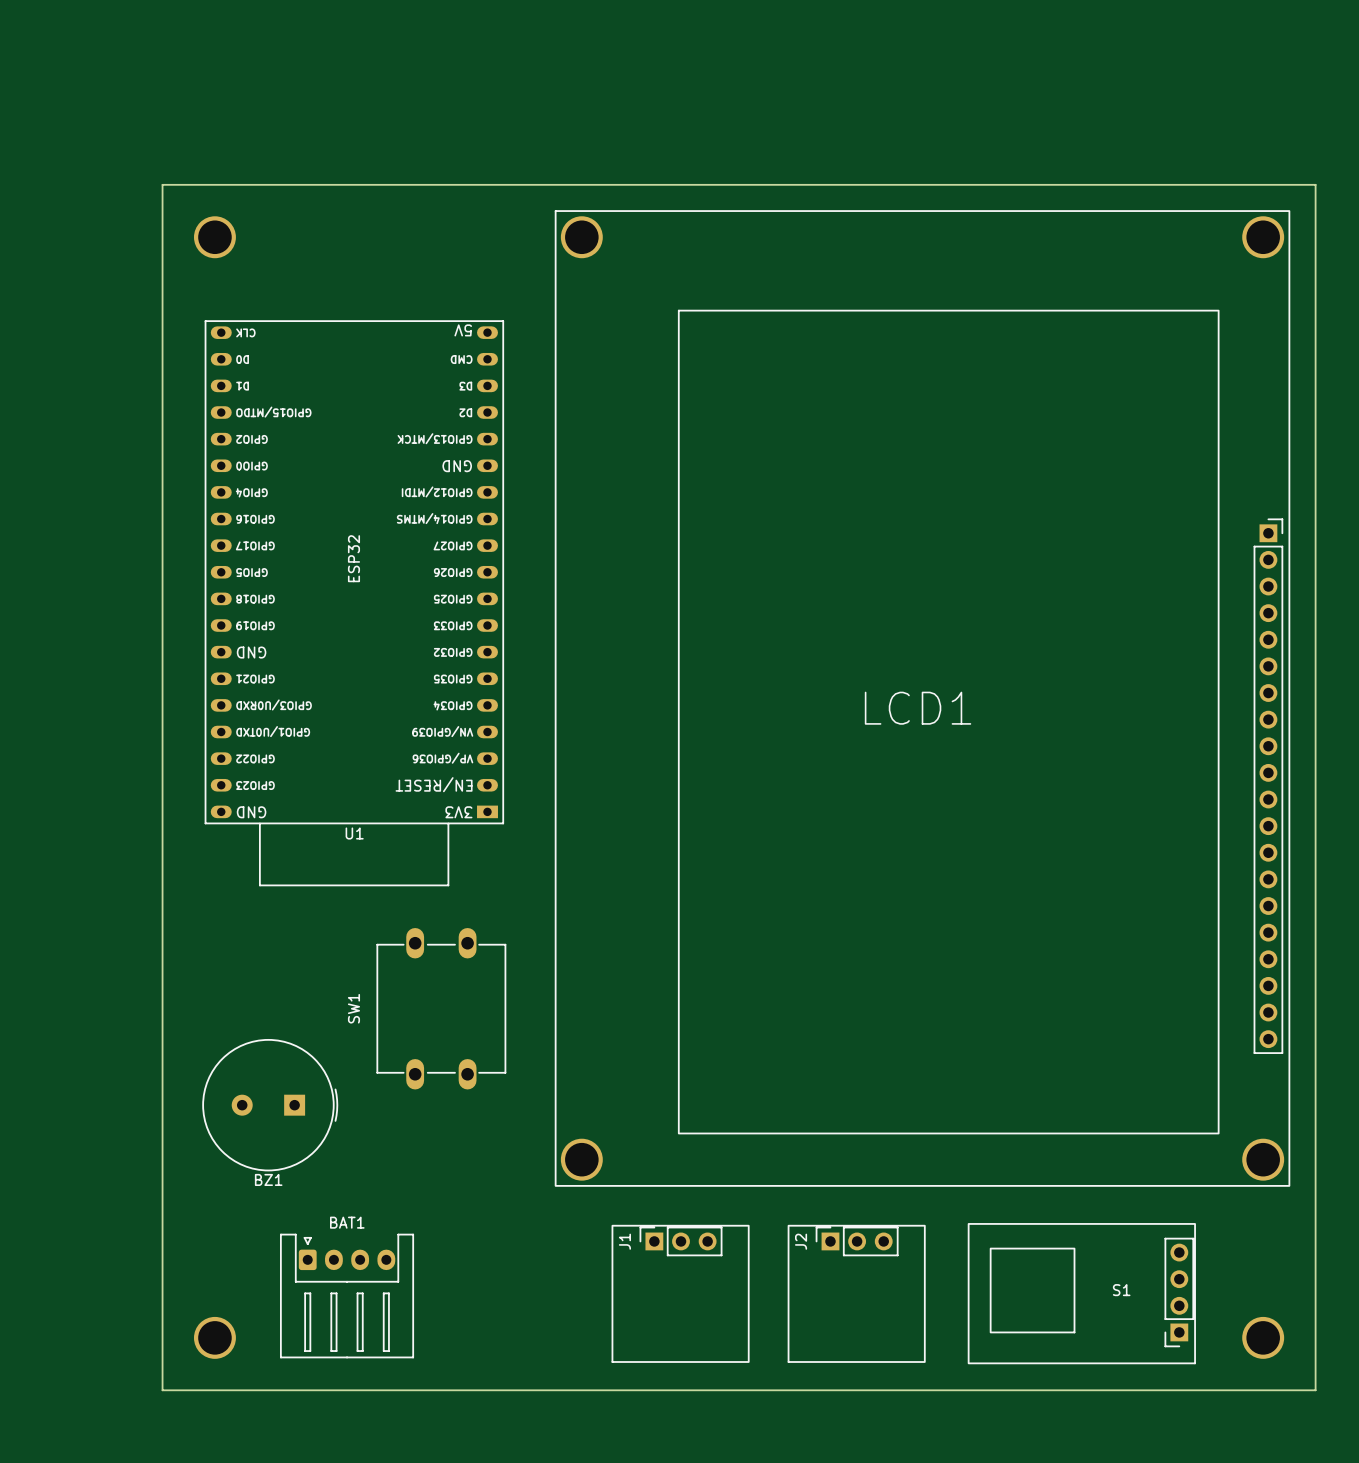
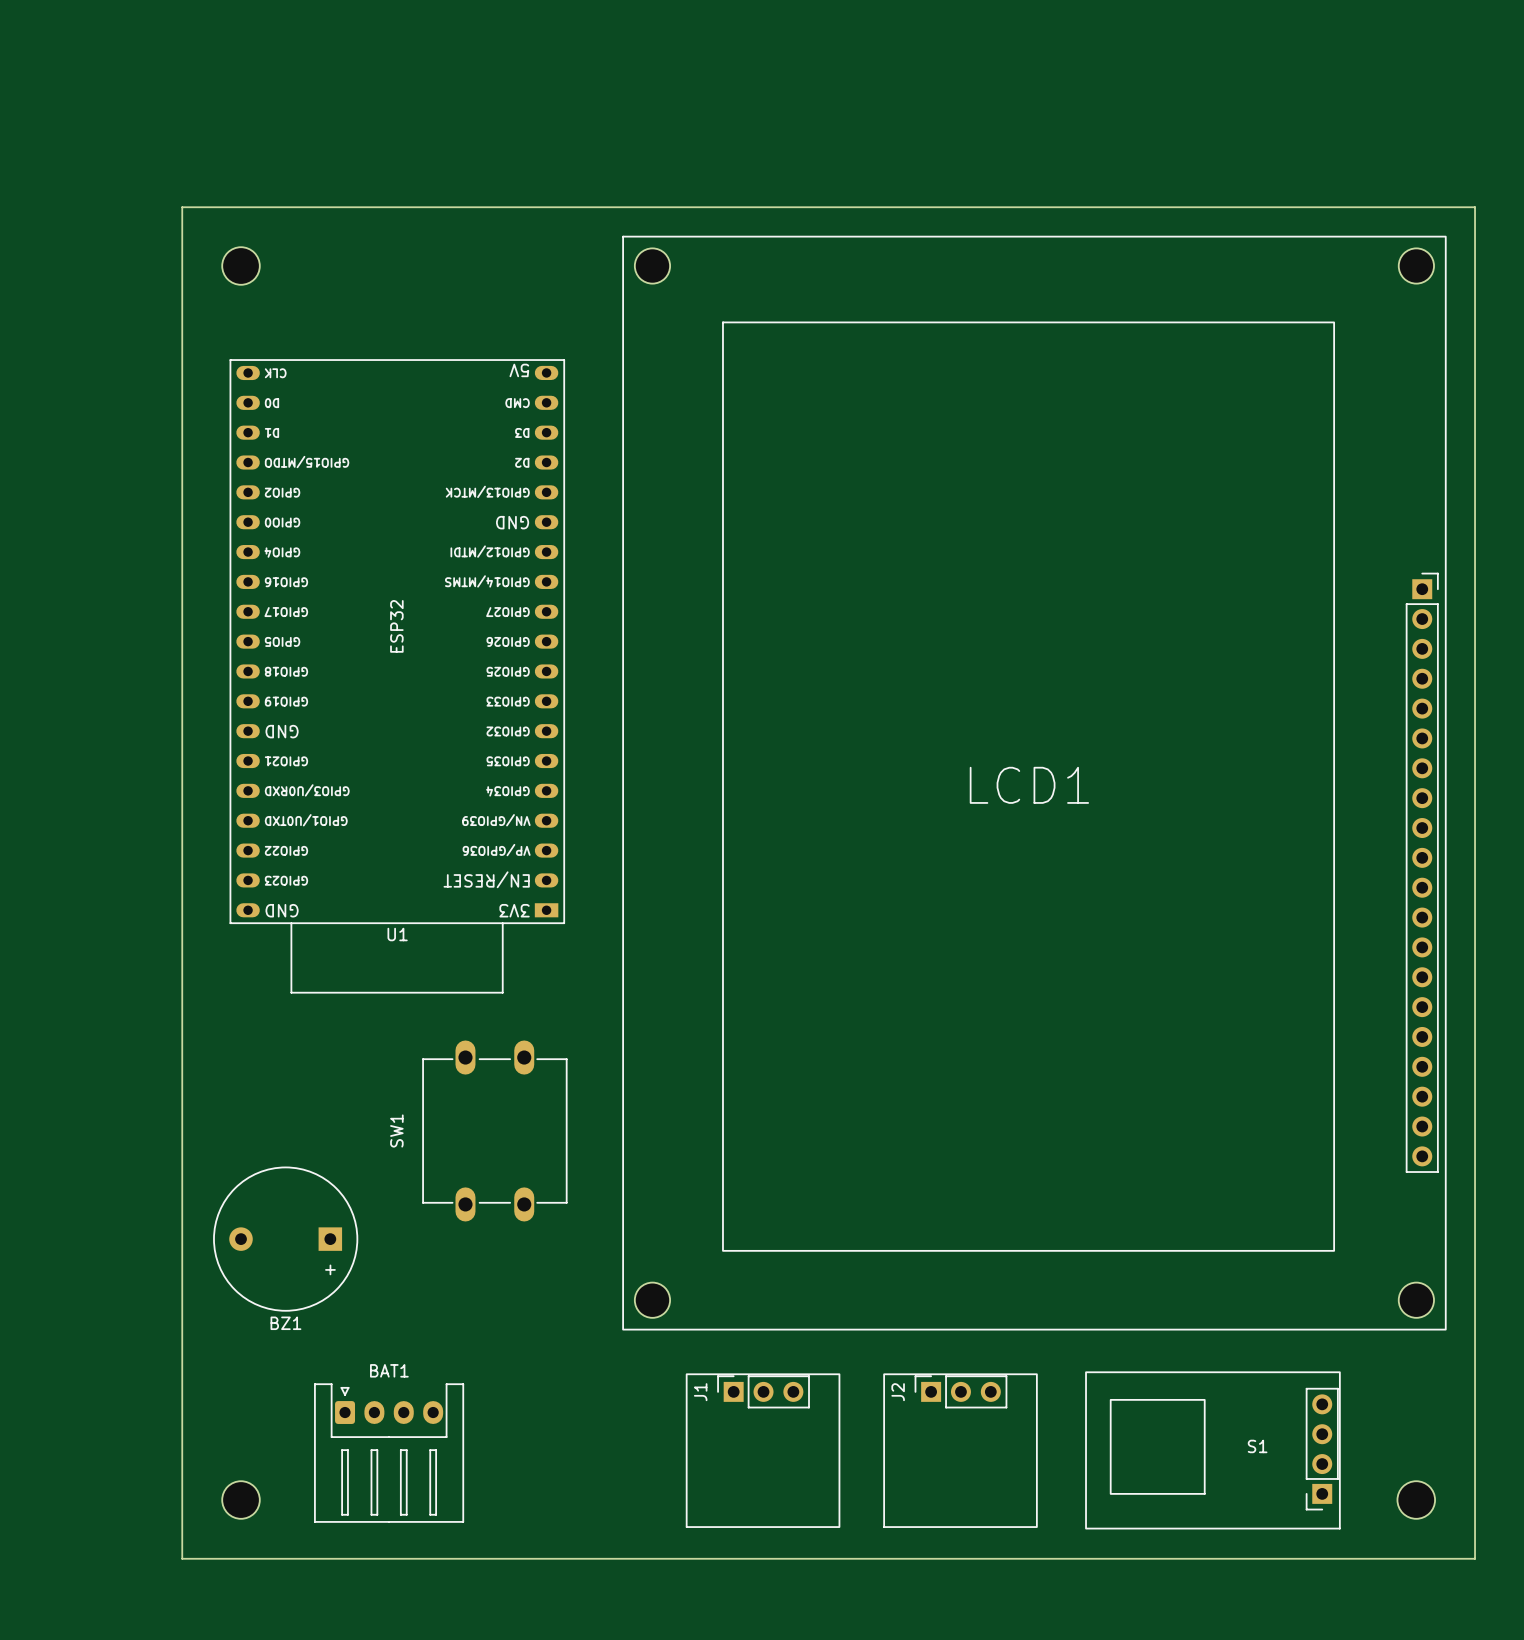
LCD1 footprint: [555, 210, 1290, 1187] -> [622, 236, 1447, 1331]
part footprint: [193, 216, 236, 259] -> [222, 247, 260, 285]
BZ1 footprint: [202, 1039, 338, 1172] -> [213, 1166, 359, 1312]
part footprint: [193, 1316, 236, 1359] -> [222, 1481, 260, 1519]
part footprint: [1242, 1316, 1285, 1359] -> [1397, 1481, 1436, 1519]

